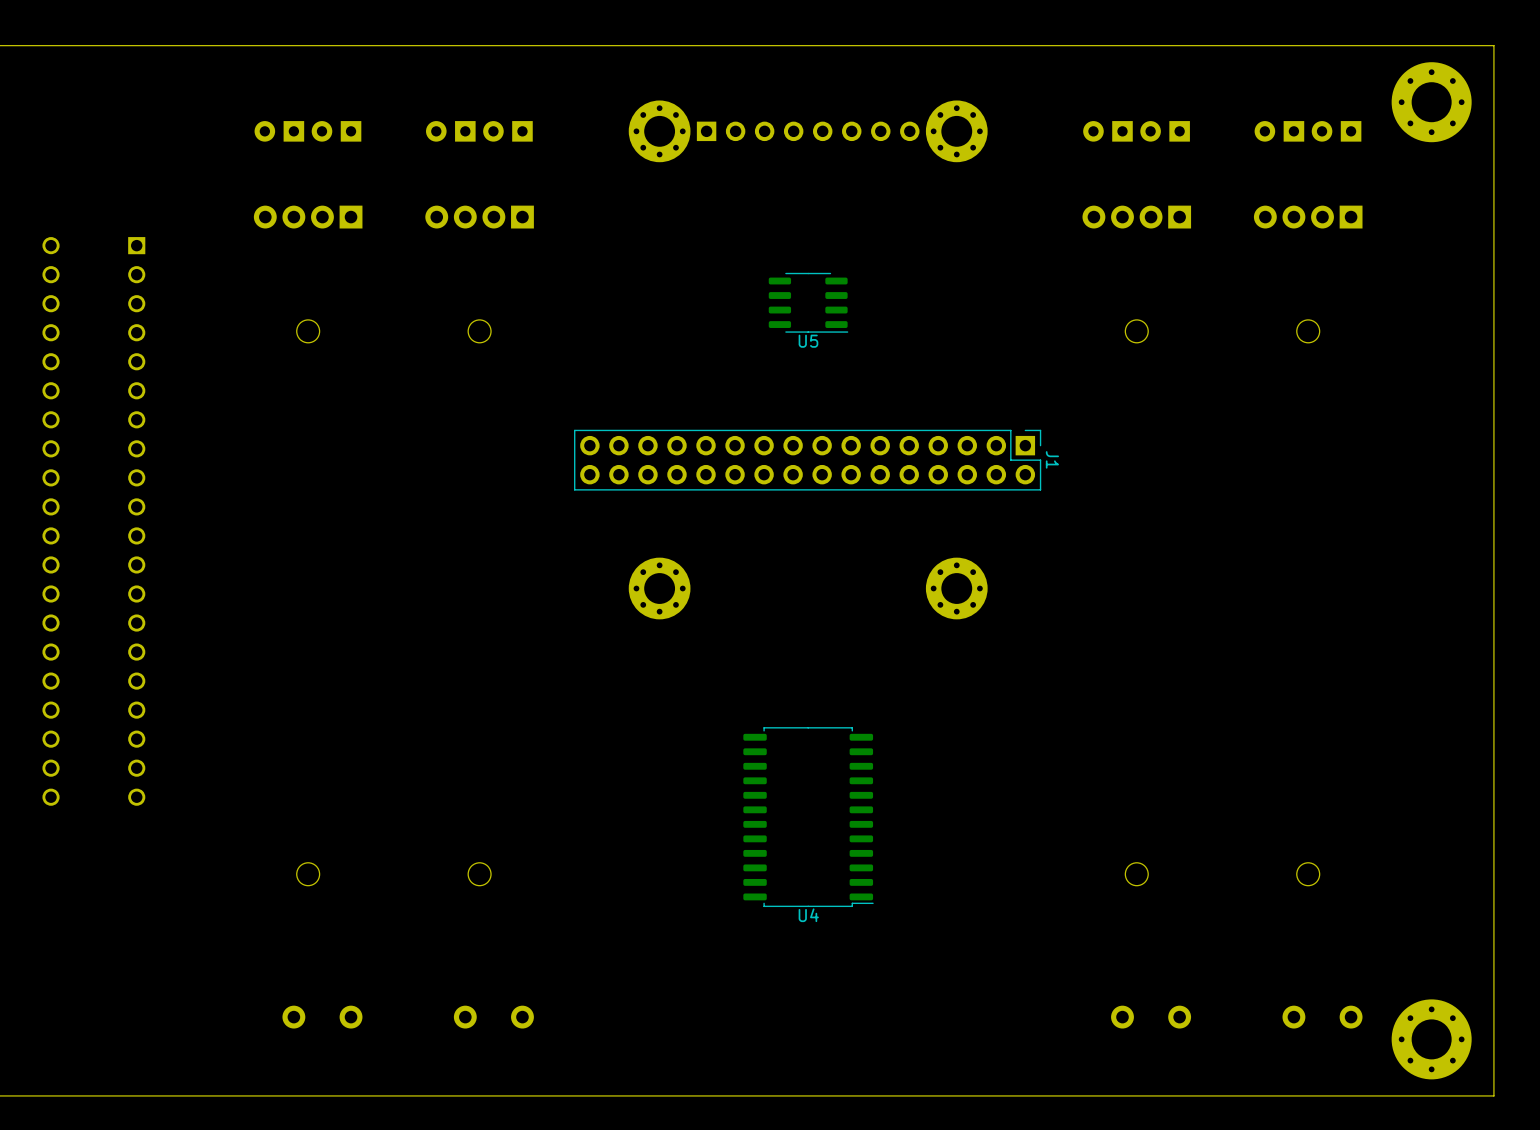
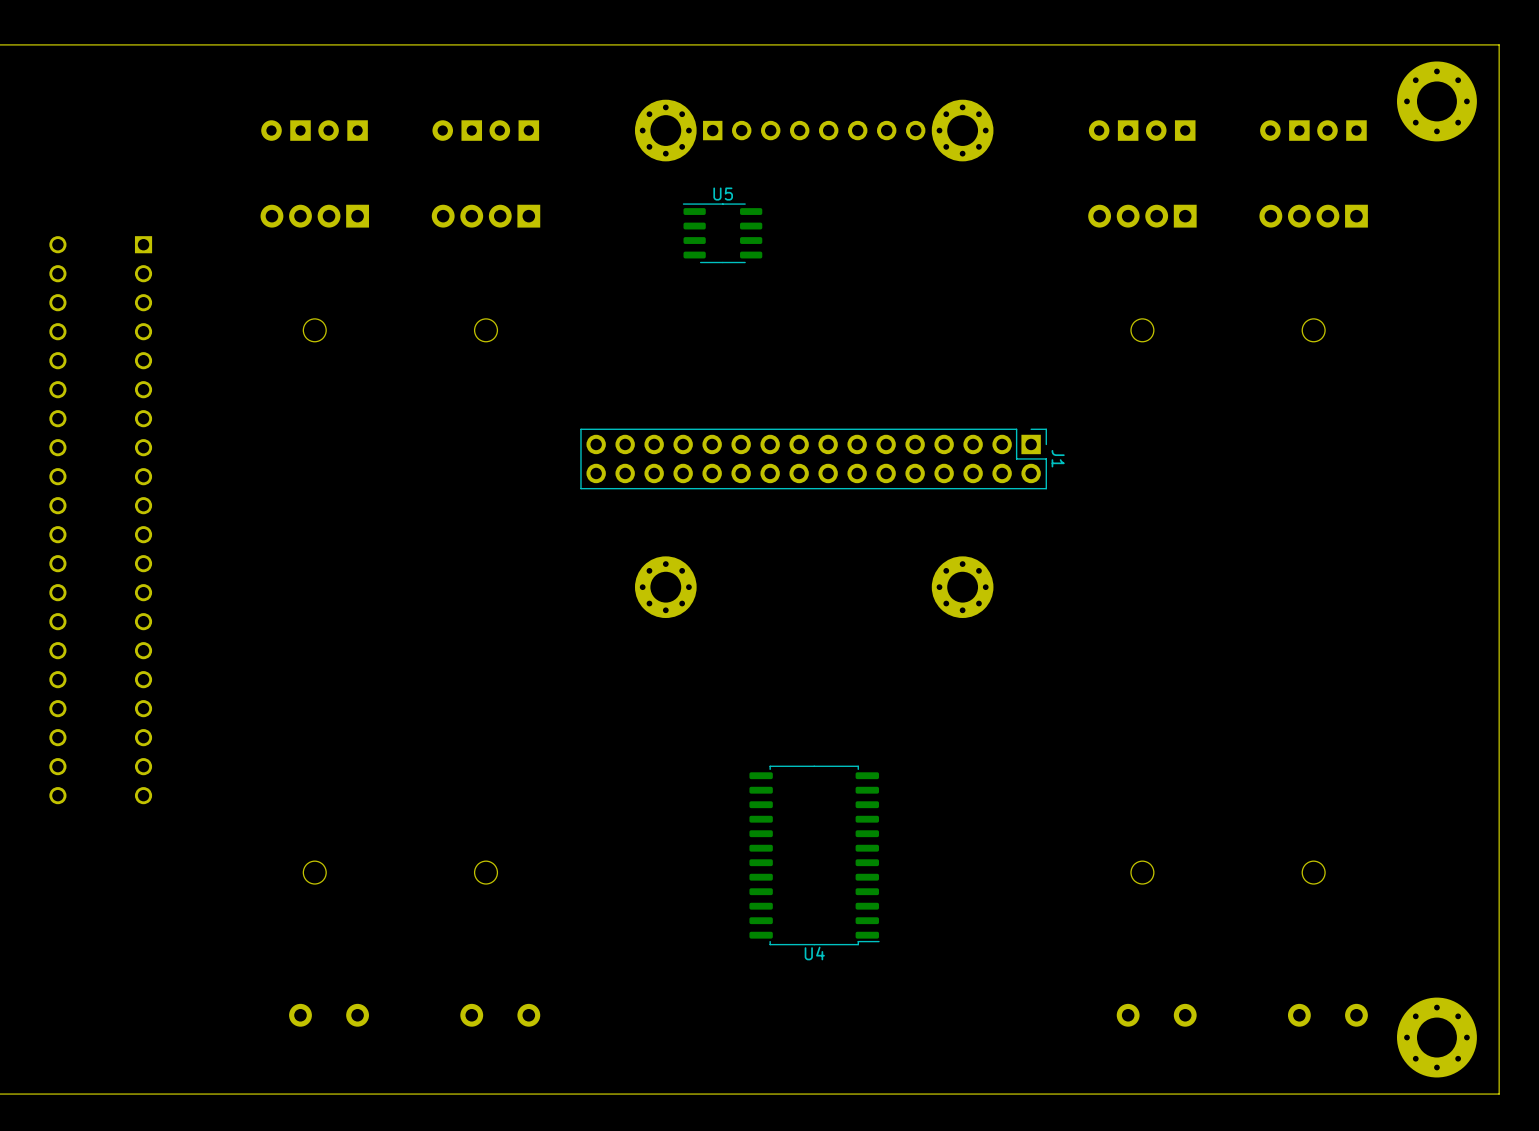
U5 rotation: 0° (808, 302) -> 180° (722, 233)
U5 position: (808, 302) -> (722, 233)
U4 position: (808, 817) -> (814, 855)

